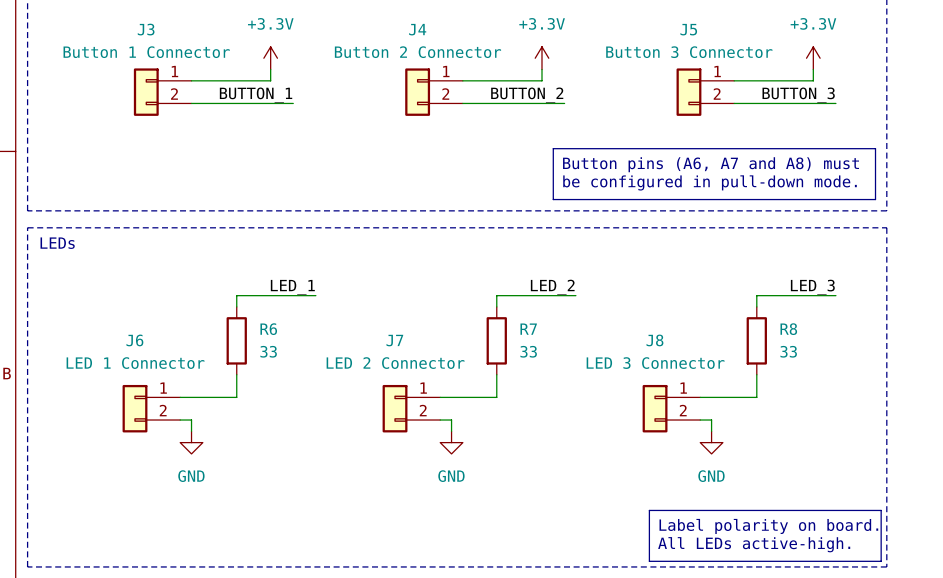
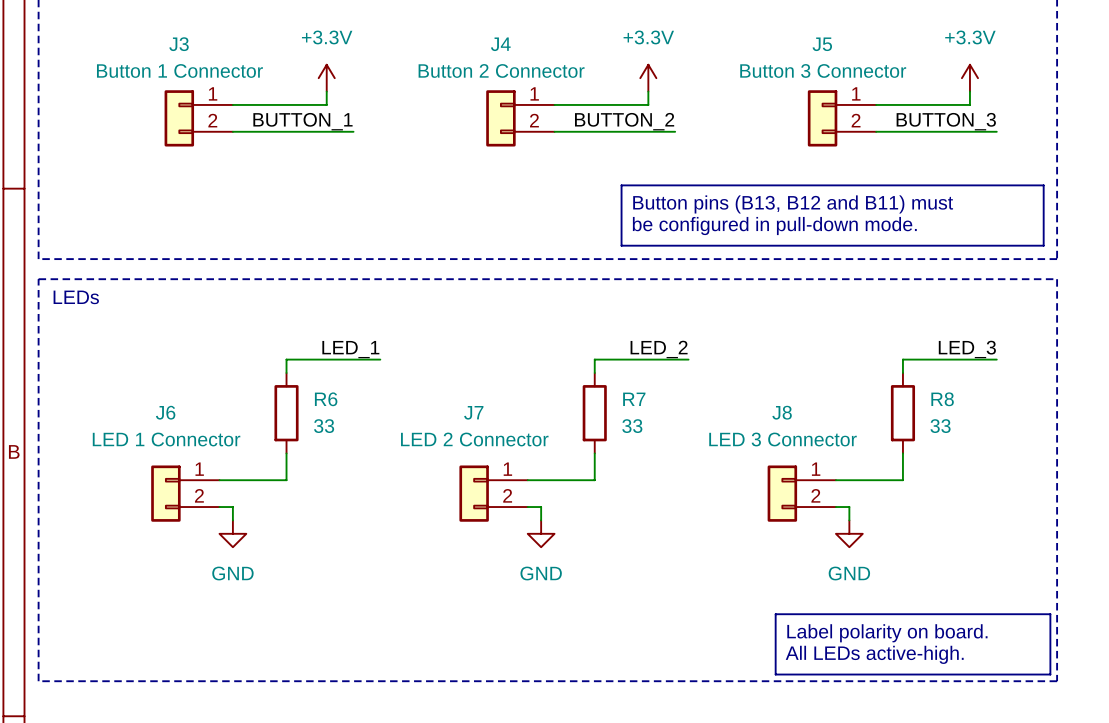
line: (553, 148) (553, 199) -> (661, 185) (621, 185) (621, 245) (661, 245)
text: Button pins (A6, A7 and A8) must (711, 164) -> Button pins (B13, B12 and B11) must (793, 204)
text position: be configured in pull-down mode. (710, 182) -> be configured in pull-down mode. (774, 226)

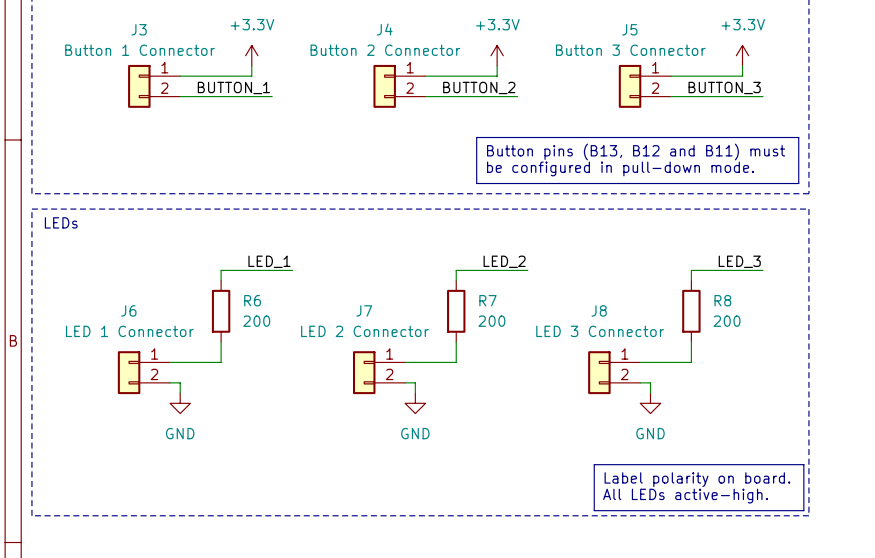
R6 value: 33 (324, 426) -> 200 (256, 321)
R7 value: 33 (632, 426) -> 200 (491, 321)
R8 value: 33 (940, 426) -> 200 (727, 321)

